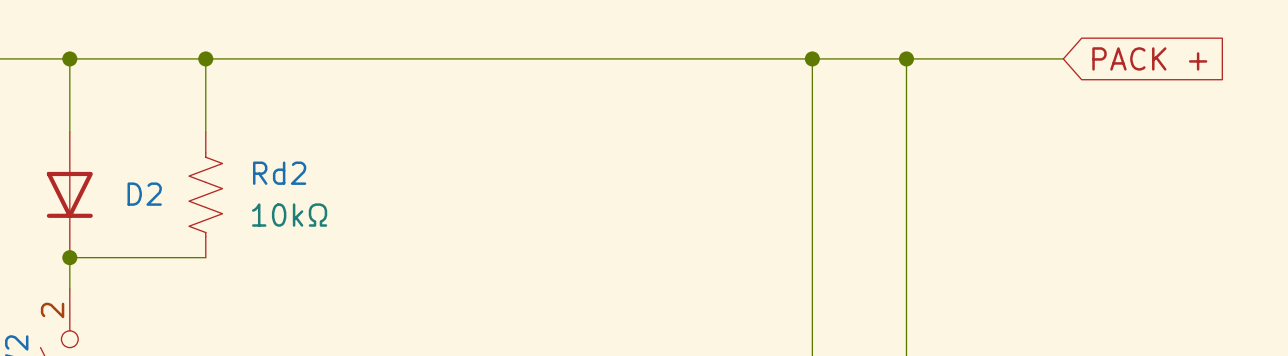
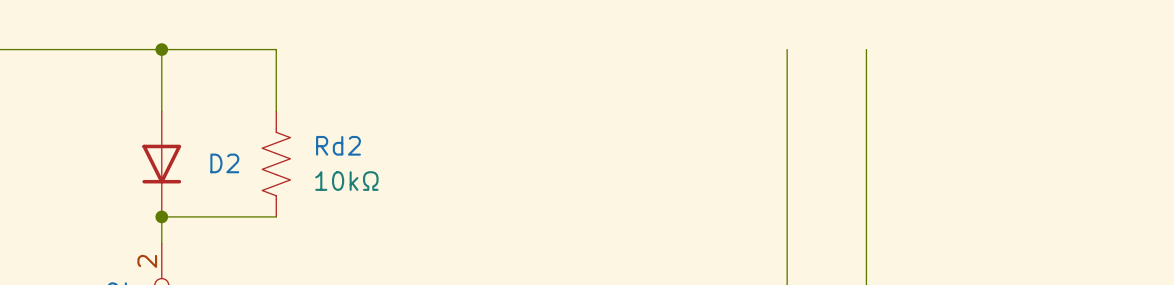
wire: (205, 58) (1063, 58) -> none
junction: (205, 58) -> none
junction: (812, 58) -> none
junction: (906, 58) -> none
global label: PACK + (1149, 58) -> none

